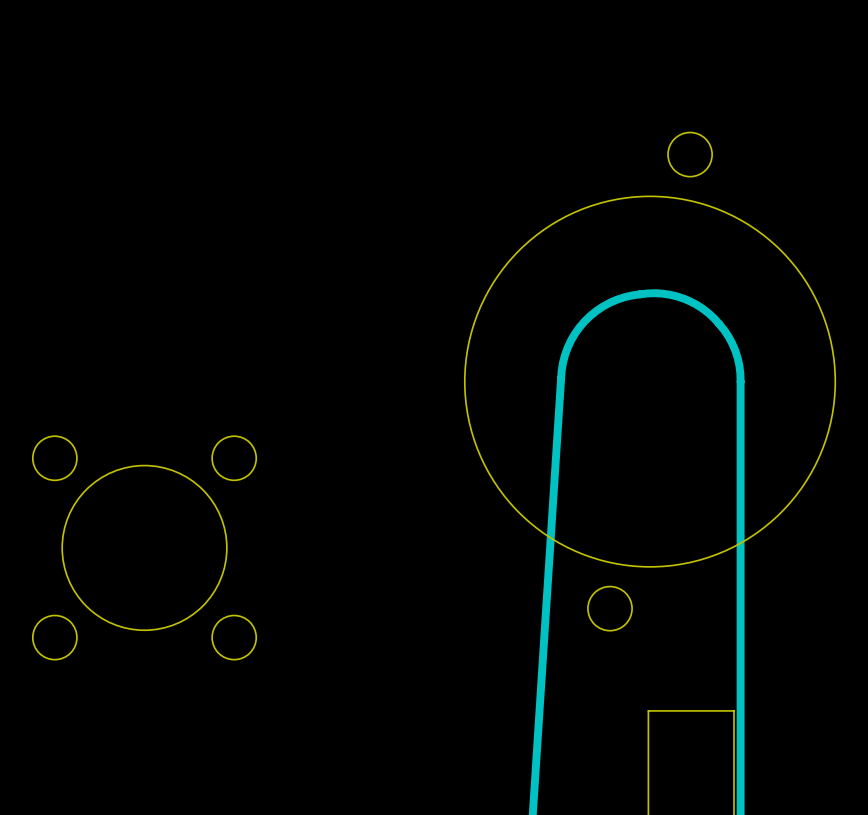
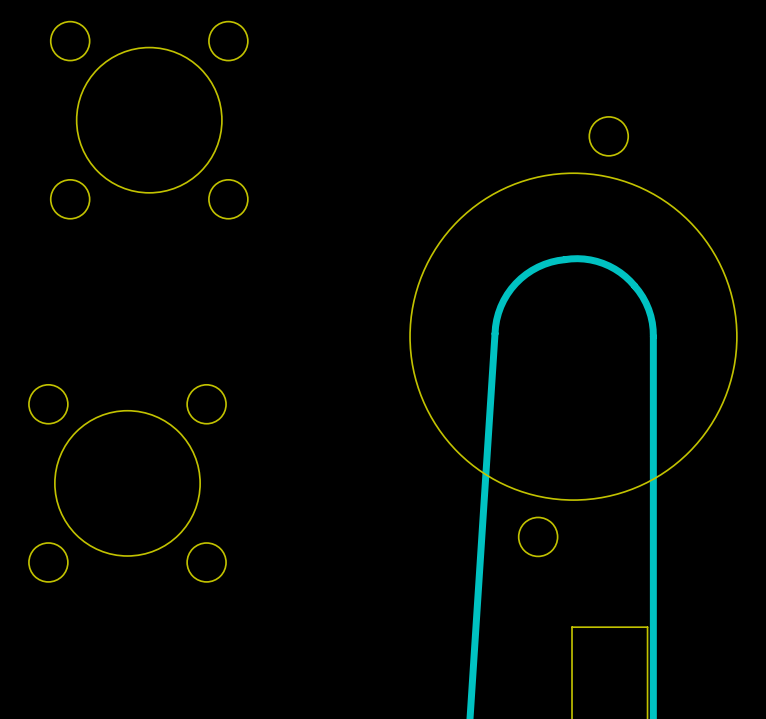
drawing: none -> [50, 21, 248, 219]

